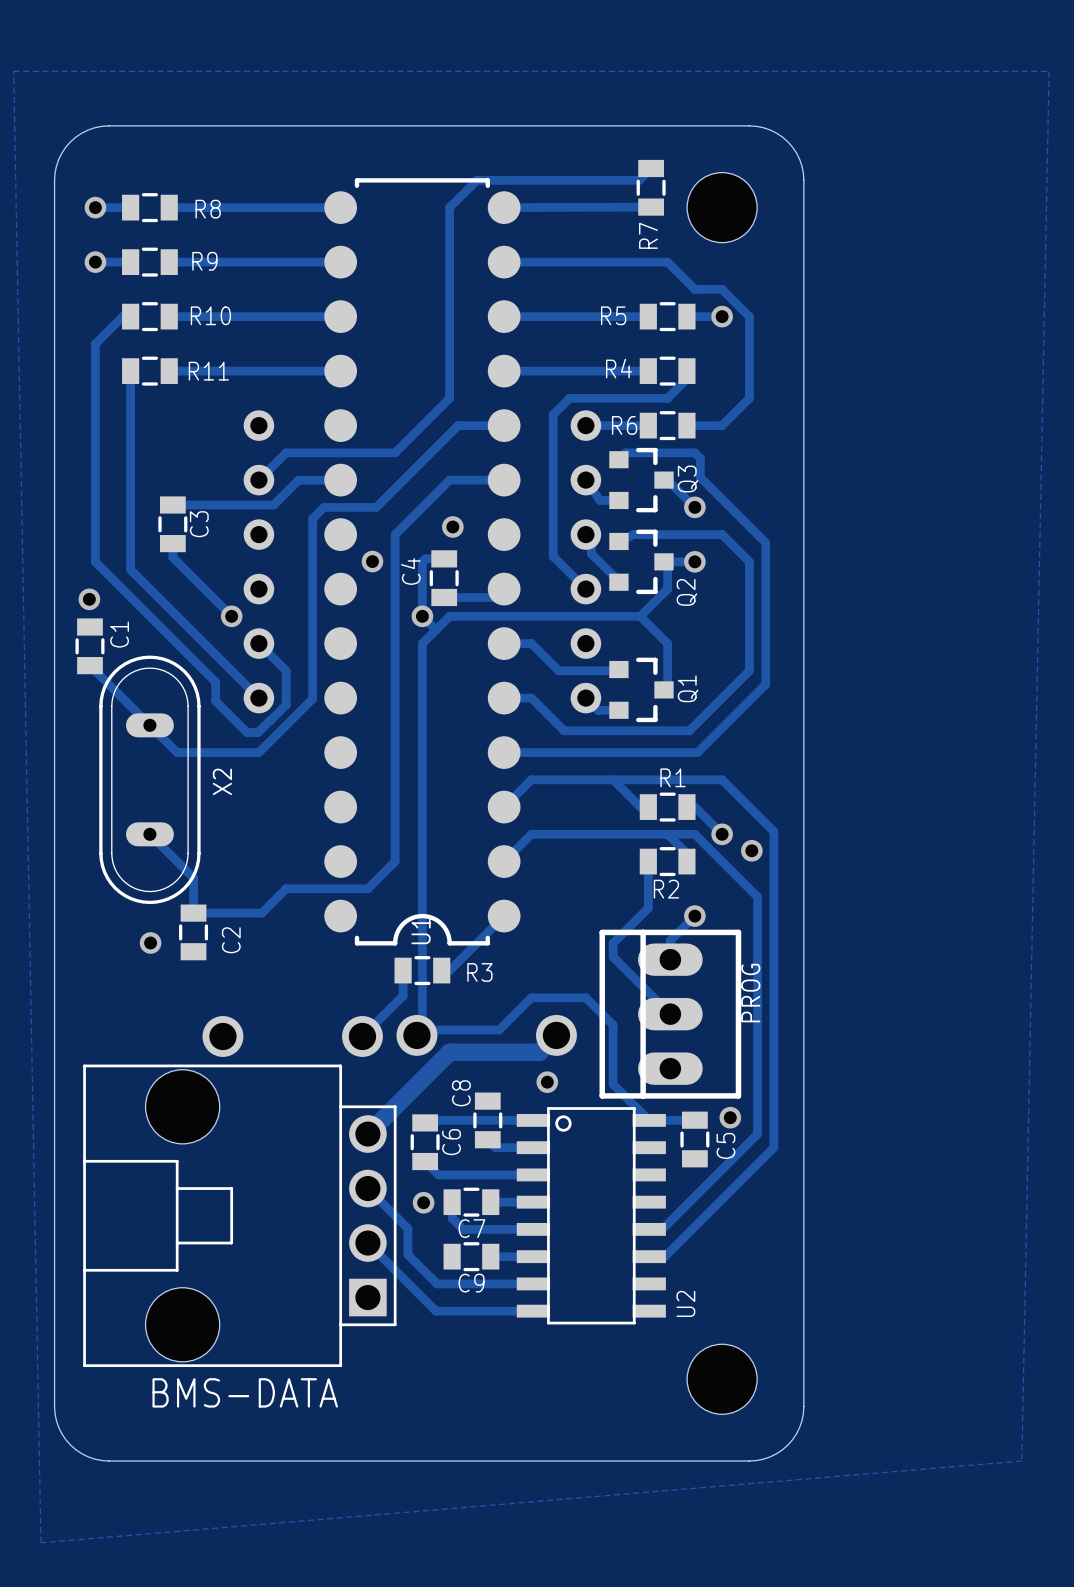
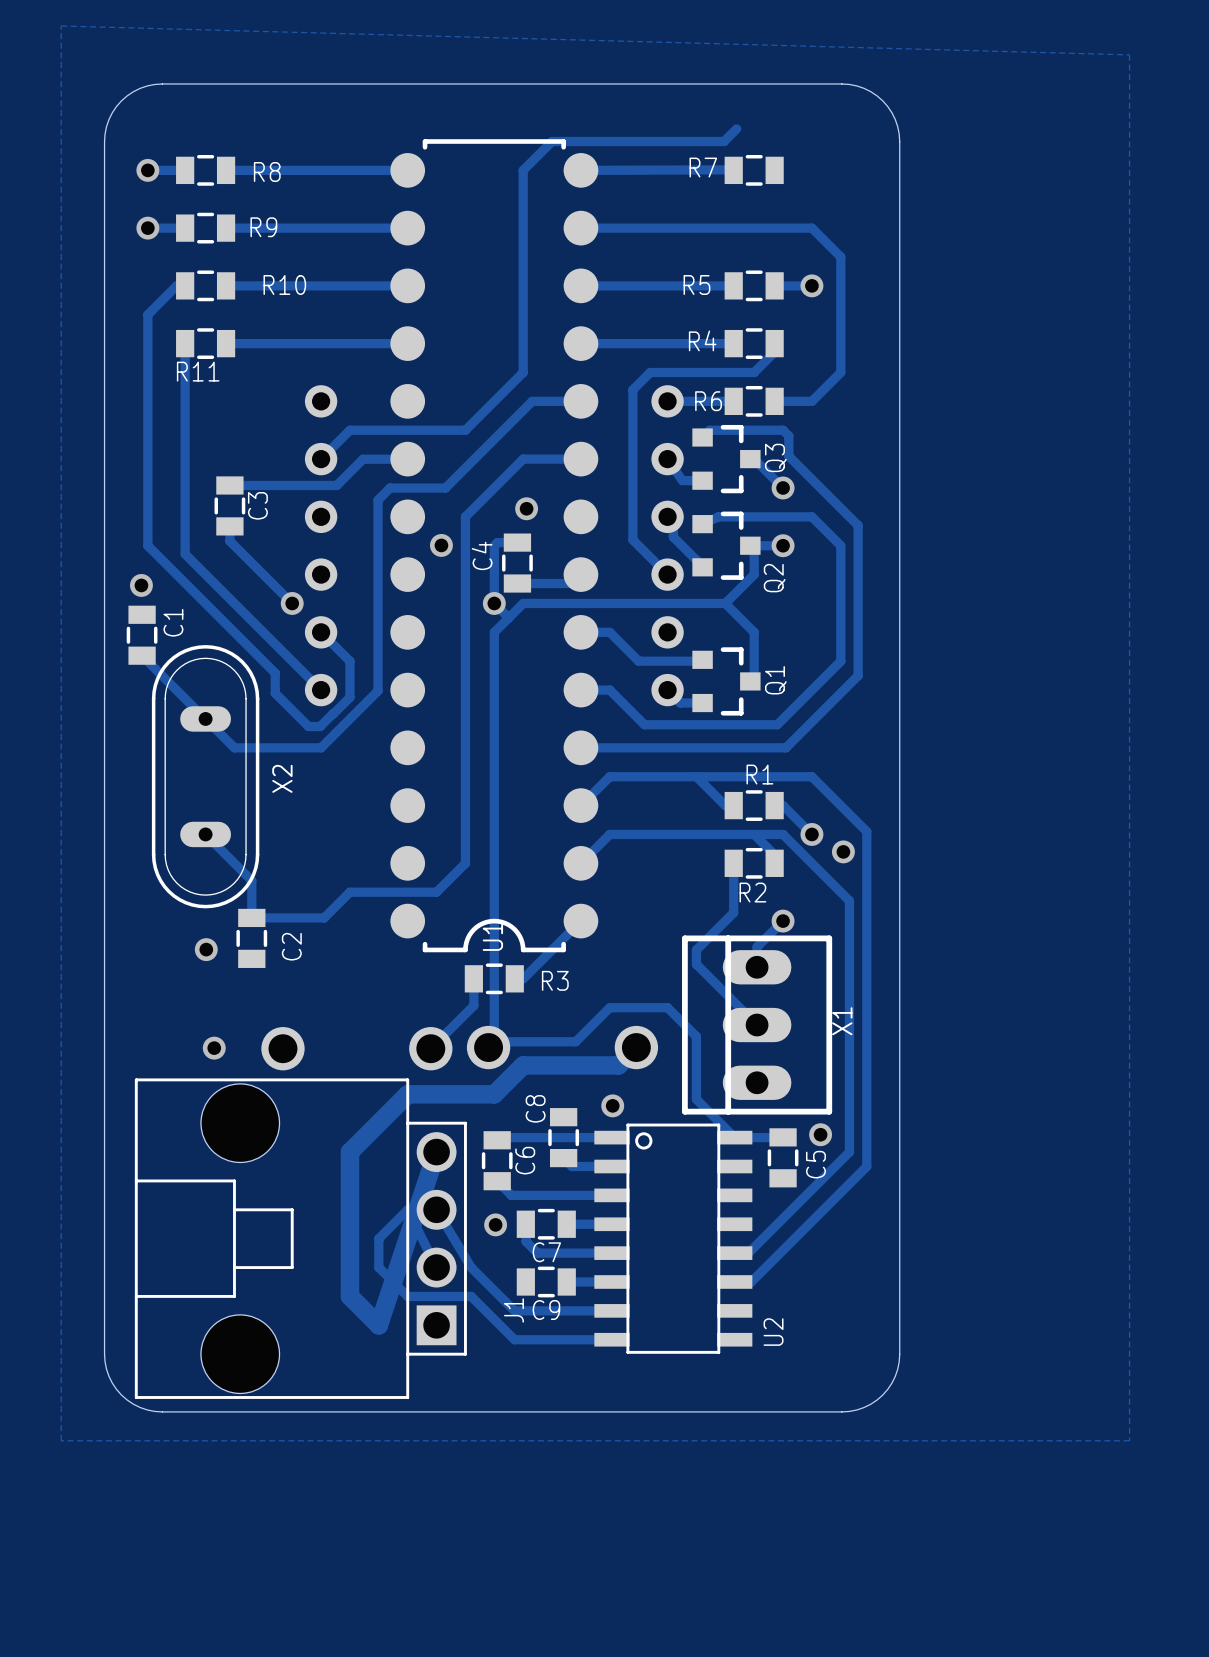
zone outline: (13, 71) (1049, 71) (1021, 1461) (40, 1542) (13, 71) -> (61, 26) (61, 1440) (1129, 1440) (1129, 54) (61, 26)
board edge: (54, 180) (58, 159) (70, 141) (88, 130) (109, 125) (749, 125) (763, 127) (776, 133) (787, 141) (796, 153) (802, 166) (803, 180) (803, 1413) (799, 1427) (787, 1445) (770, 1456) (756, 1460) (101, 1460) (88, 1456) (75, 1449) (65, 1439) (58, 1427) (54, 1406) (54, 1324) -> (104, 141) (108, 119) (121, 100) (140, 88) (162, 83) (849, 84) (864, 88) (882, 100) (895, 119) (899, 141) (899, 1354) (897, 1369) (891, 1383) (882, 1395) (870, 1404) (856, 1409) (841, 1411) (162, 1411) (140, 1407) (121, 1395) (108, 1376) (104, 1354)
R7 rotation: 0° (651, 187) -> 90° clockwise (754, 170)
part: (722, 207) -> none
track: (667, 262) (694, 289) (722, 289) (749, 316) -> (754, 228) (811, 228) (840, 256) (840, 285)
R10 name position: R10 (210, 315) -> R10 (284, 285)
R11 name position: R11 (208, 371) -> R11 (198, 371)
PROG name: PROG (750, 993) -> X1 (842, 1021)
via: none -> (214, 1048)
track: (422, 1079) (367, 1134) -> (494, 1094) (407, 1094) (349, 1152) (349, 1296) (378, 1325) (436, 1152)
via position: (547, 1082) -> (612, 1105)
track: (367, 1188) (407, 1228) (407, 1254) (437, 1283) (441, 1283) -> (436, 1209) (471, 1267) (514, 1310)
track: (367, 1243) (436, 1311) (441, 1311) -> (436, 1267) (407, 1209) (378, 1238) (378, 1267) (407, 1296) (471, 1296) (514, 1339)
part: (722, 1379) -> none
BMS-DATA name: BMS-DATA (245, 1392) -> J1 (513, 1310)

